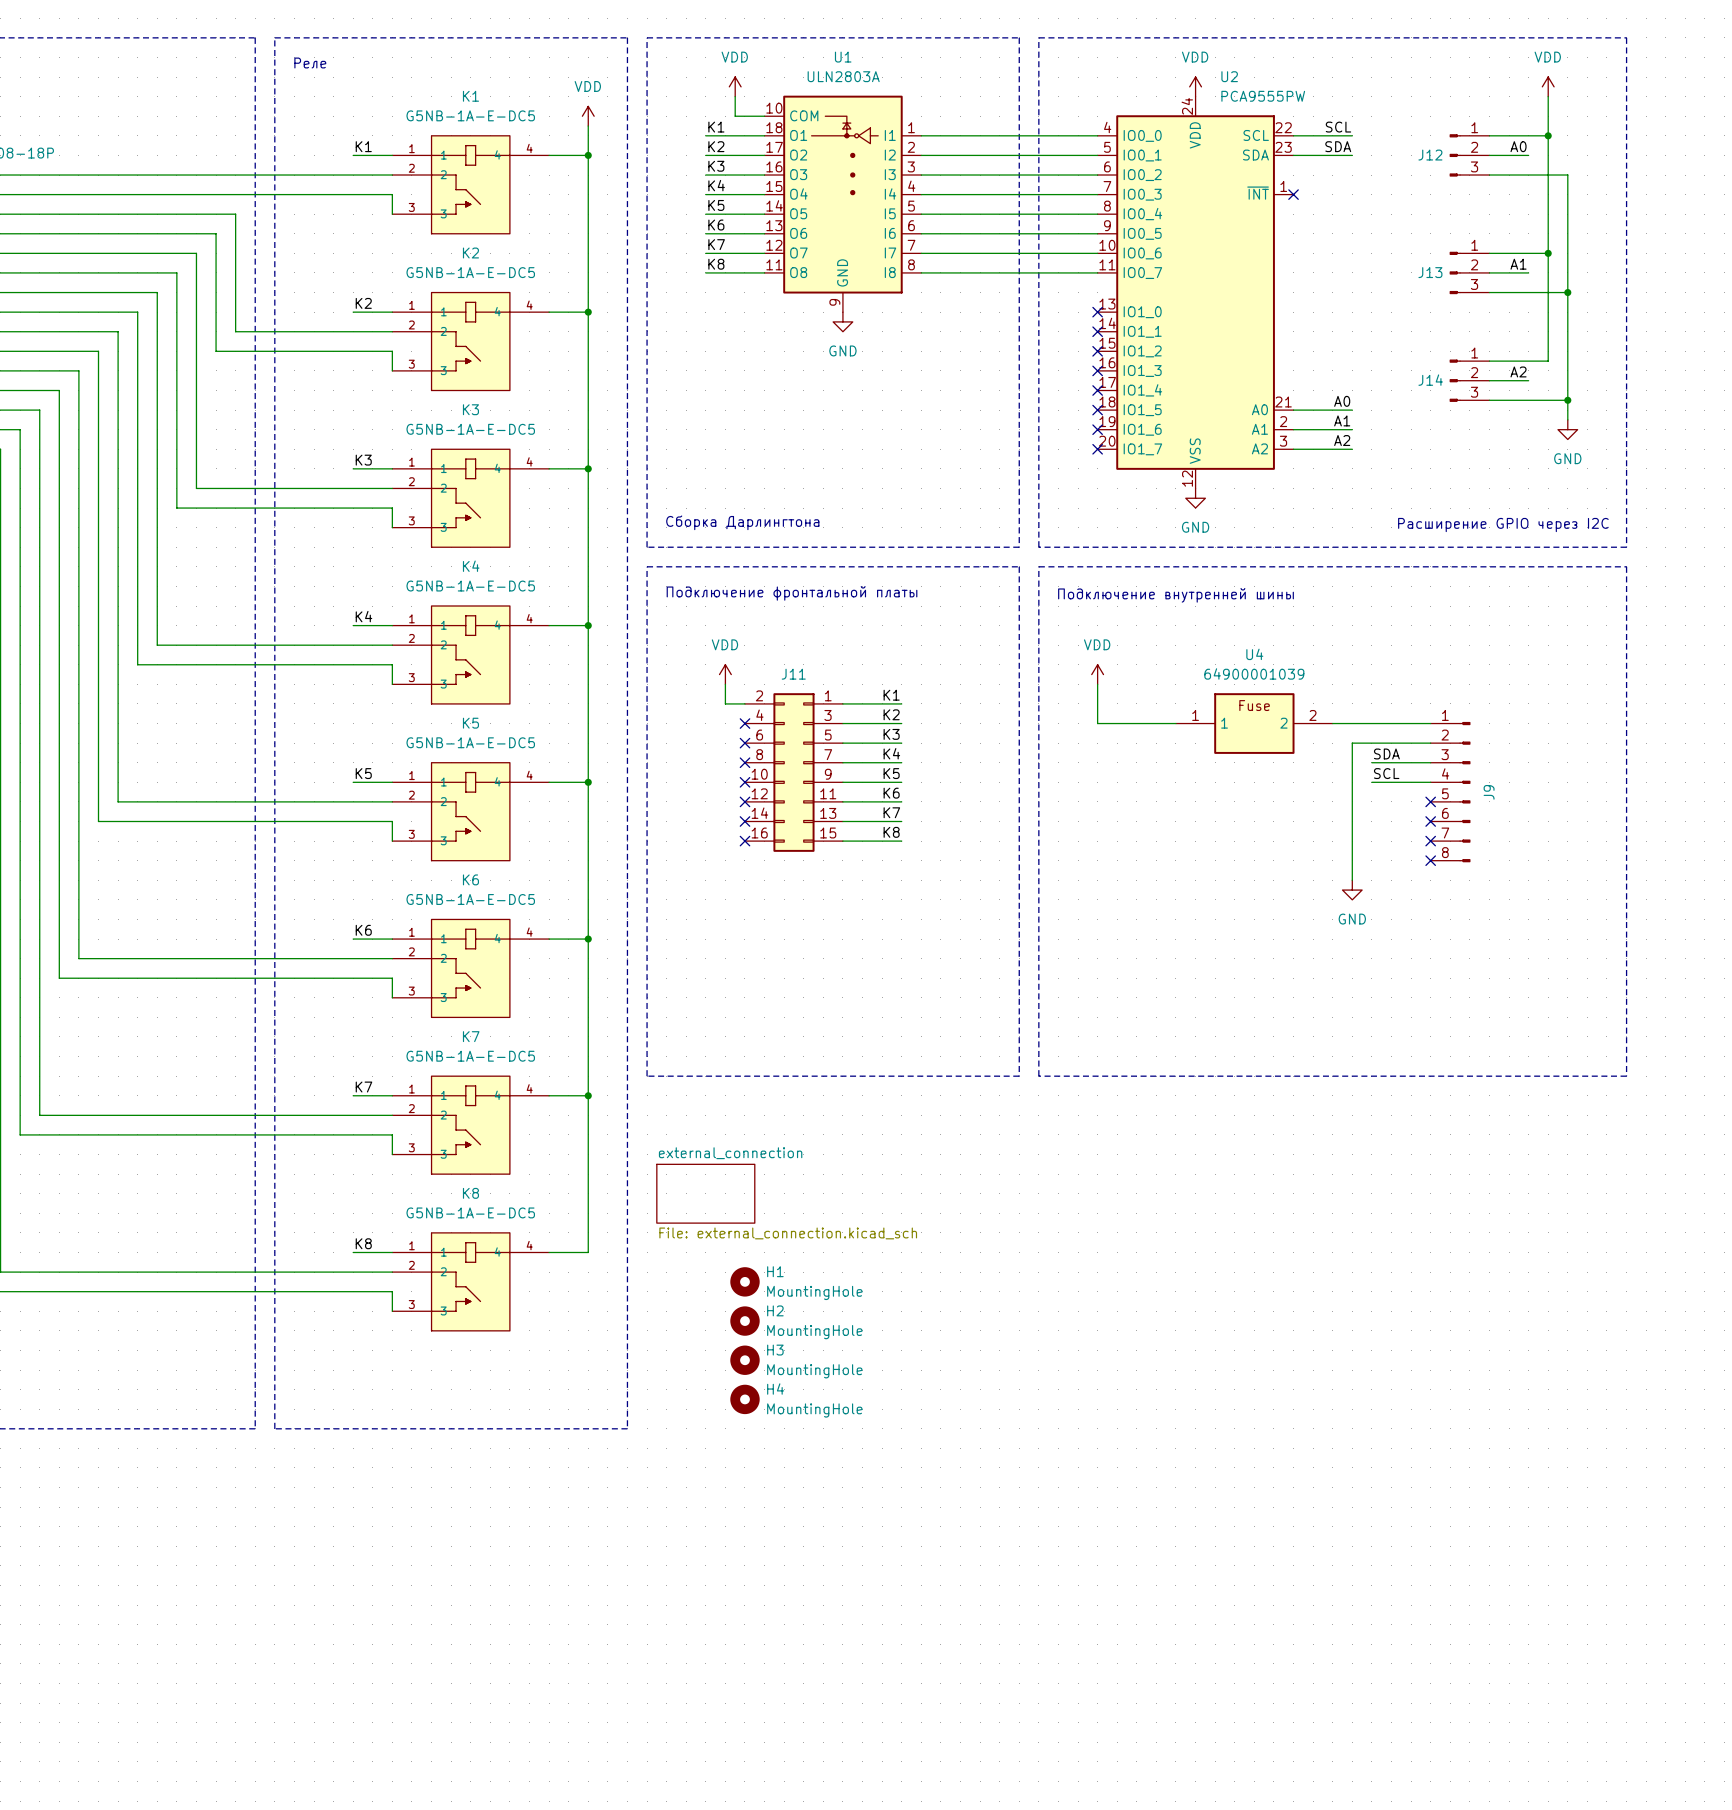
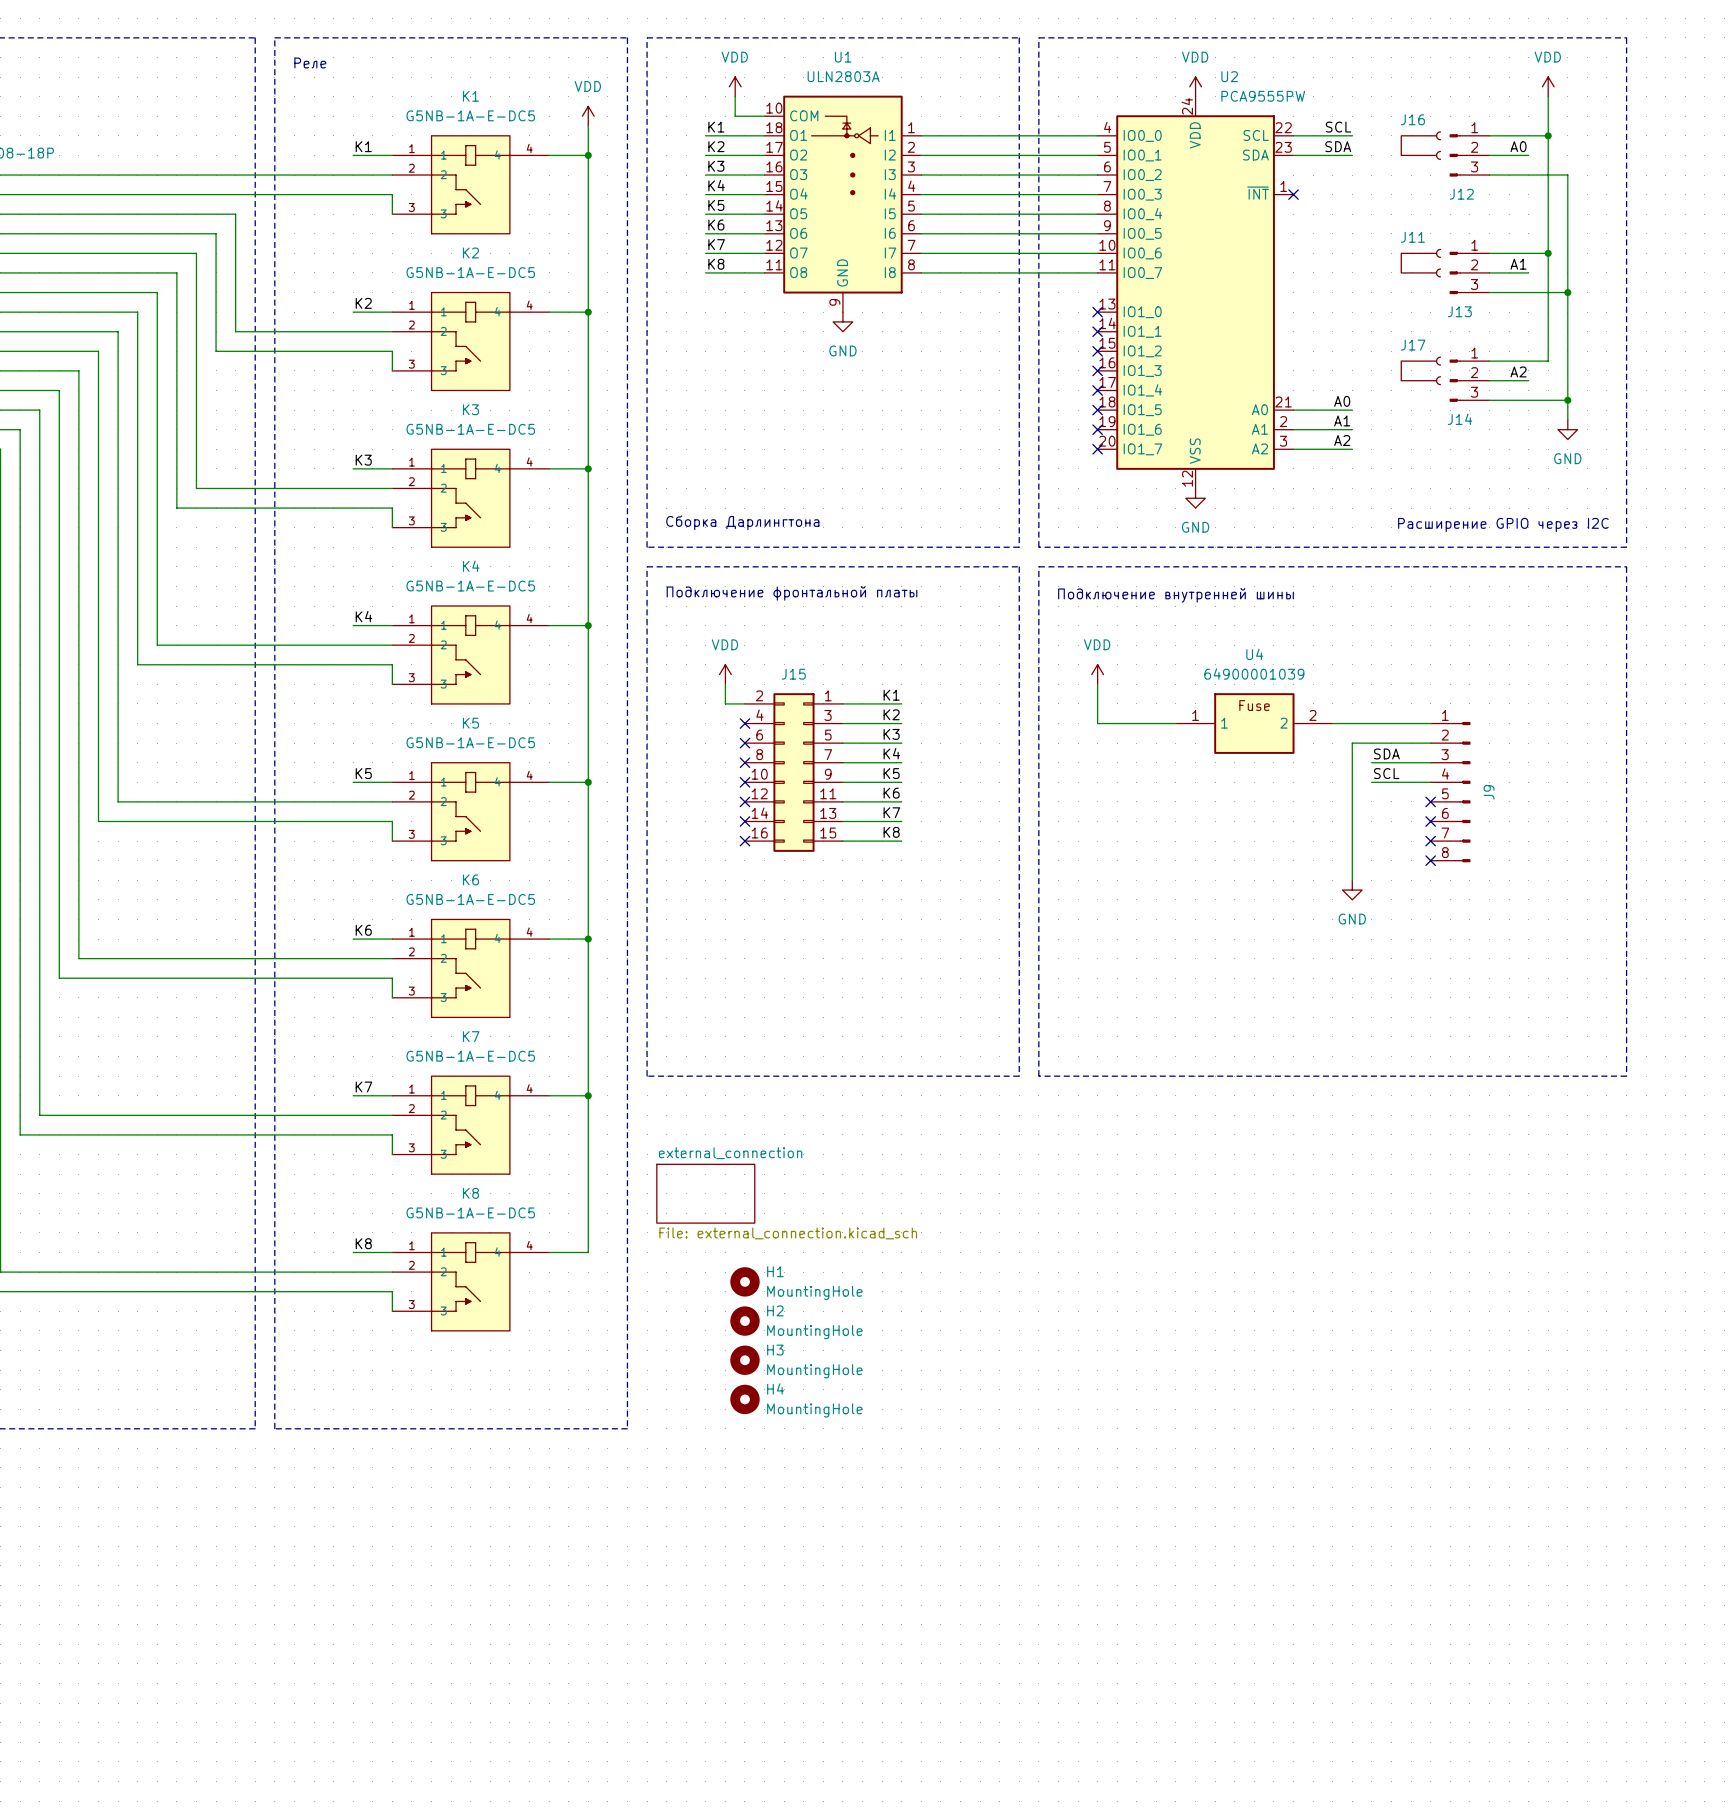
J16: none -> (1421, 145)
J12 name position: J12 (1430, 155) -> J12 (1461, 194)
J11: none -> (1421, 263)
J13 name position: J13 (1430, 272) -> J13 (1459, 311)
J17: none -> (1421, 370)
J14 name position: J14 (1430, 380) -> J14 (1460, 419)
J11 name: J11 (793, 674) -> J15 (793, 674)

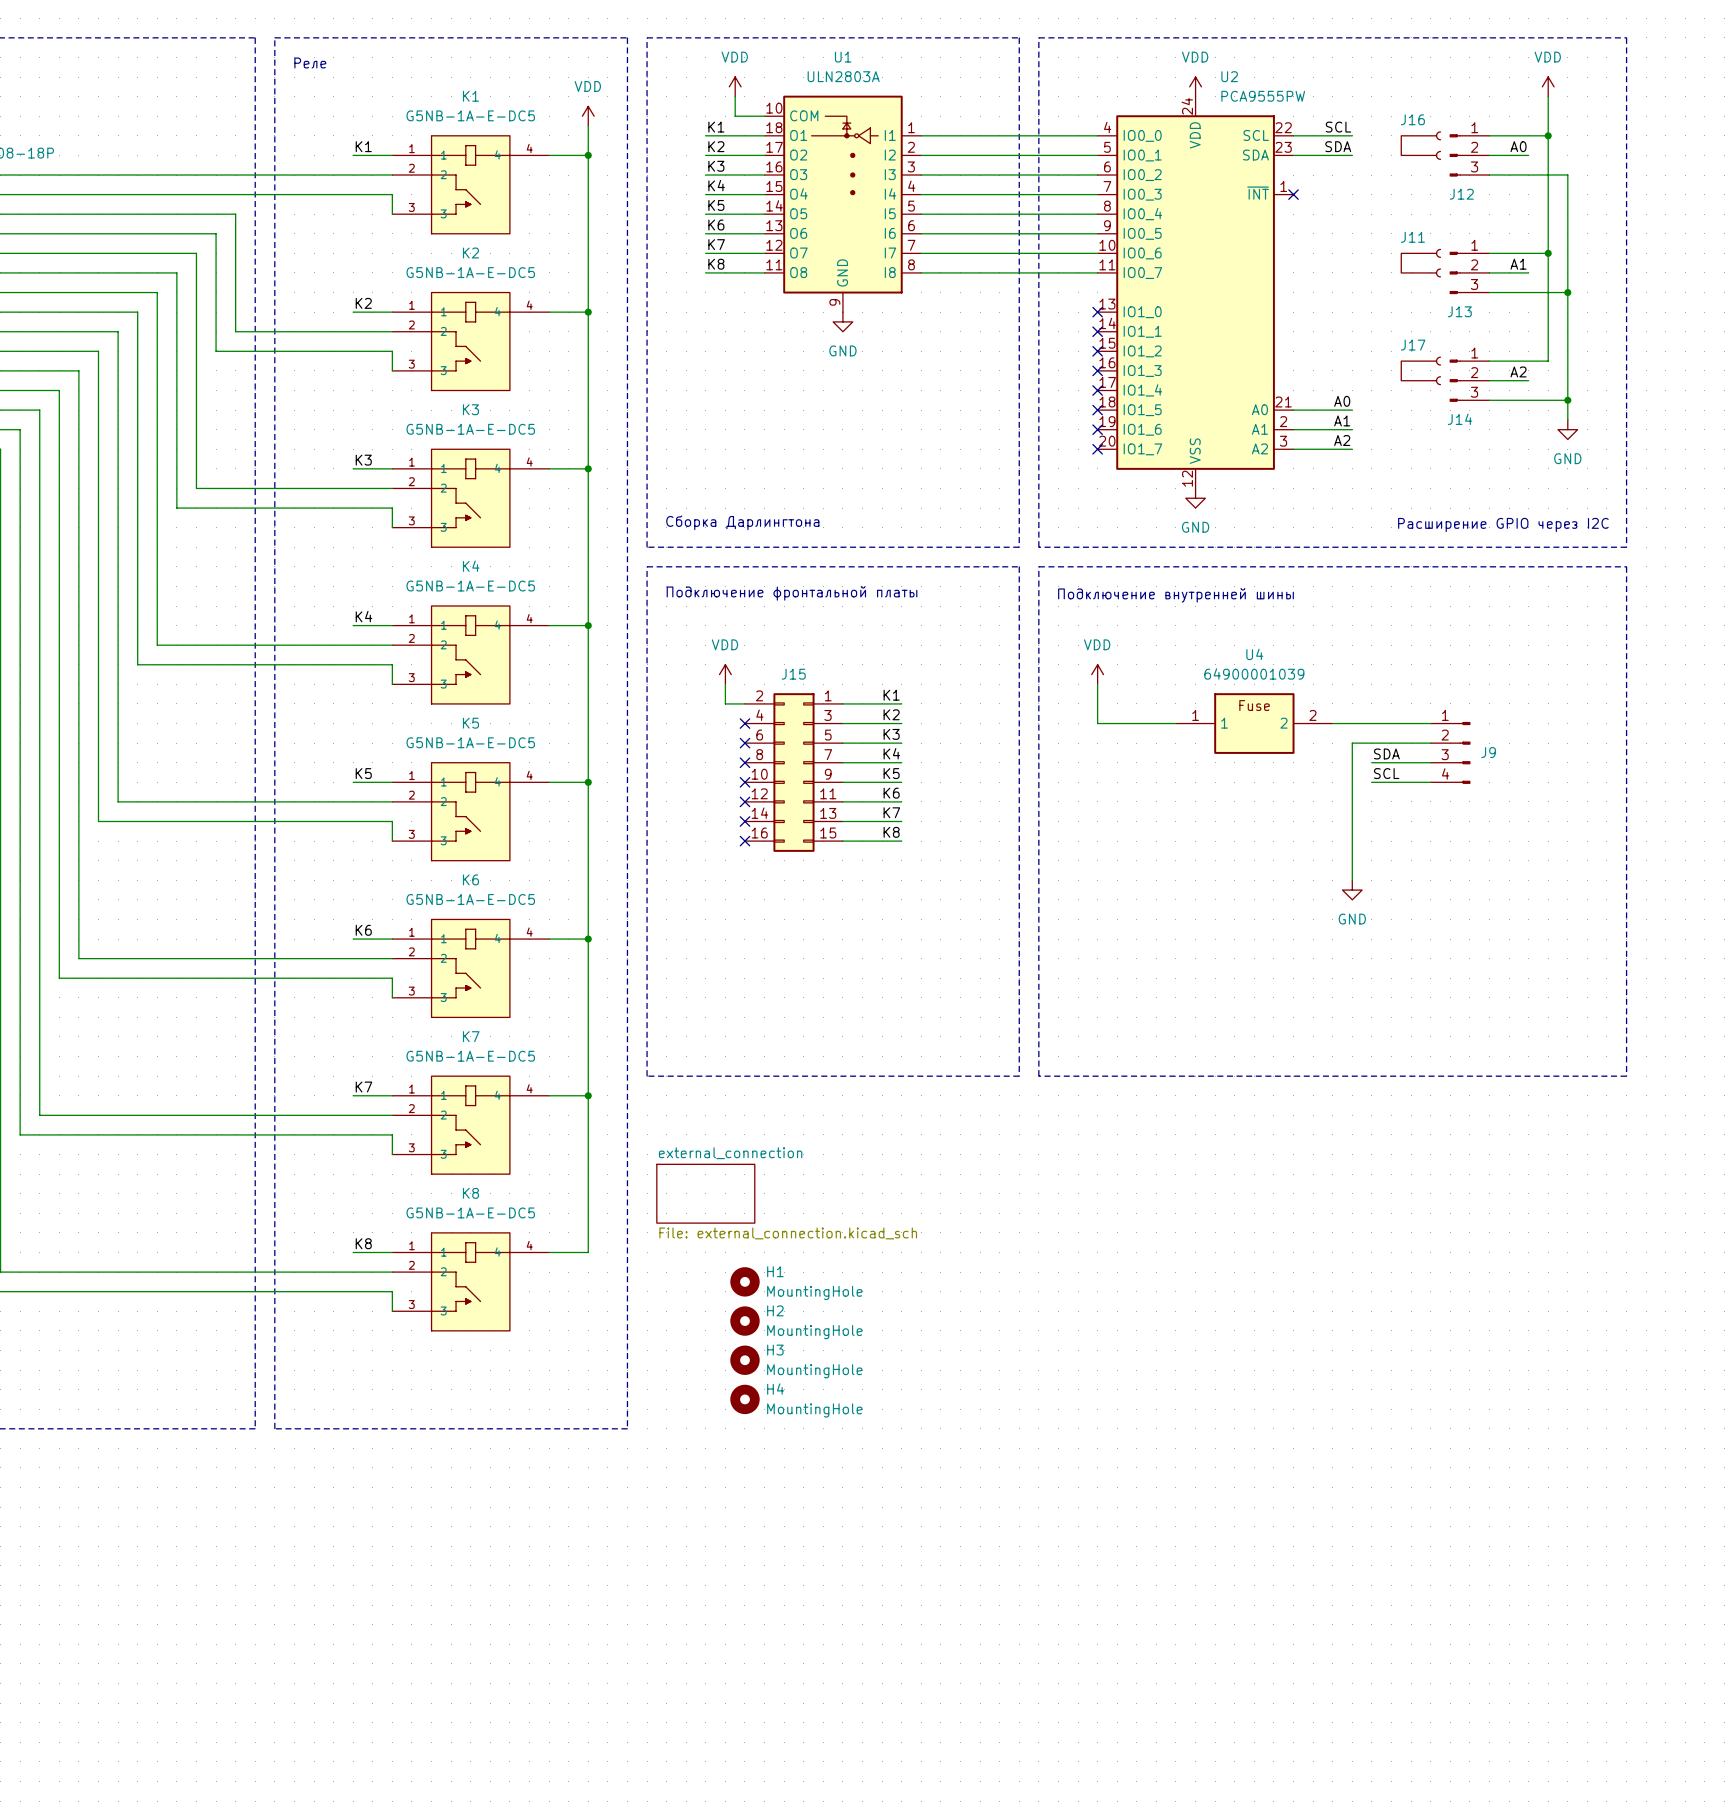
J9 symbol: [1430, 721, 1471, 863] -> [1430, 721, 1471, 784]
no-connect mark: (1430, 801) -> none
no-connect mark: (1430, 821) -> none
no-connect mark: (1430, 841) -> none
no-connect mark: (1430, 860) -> none

